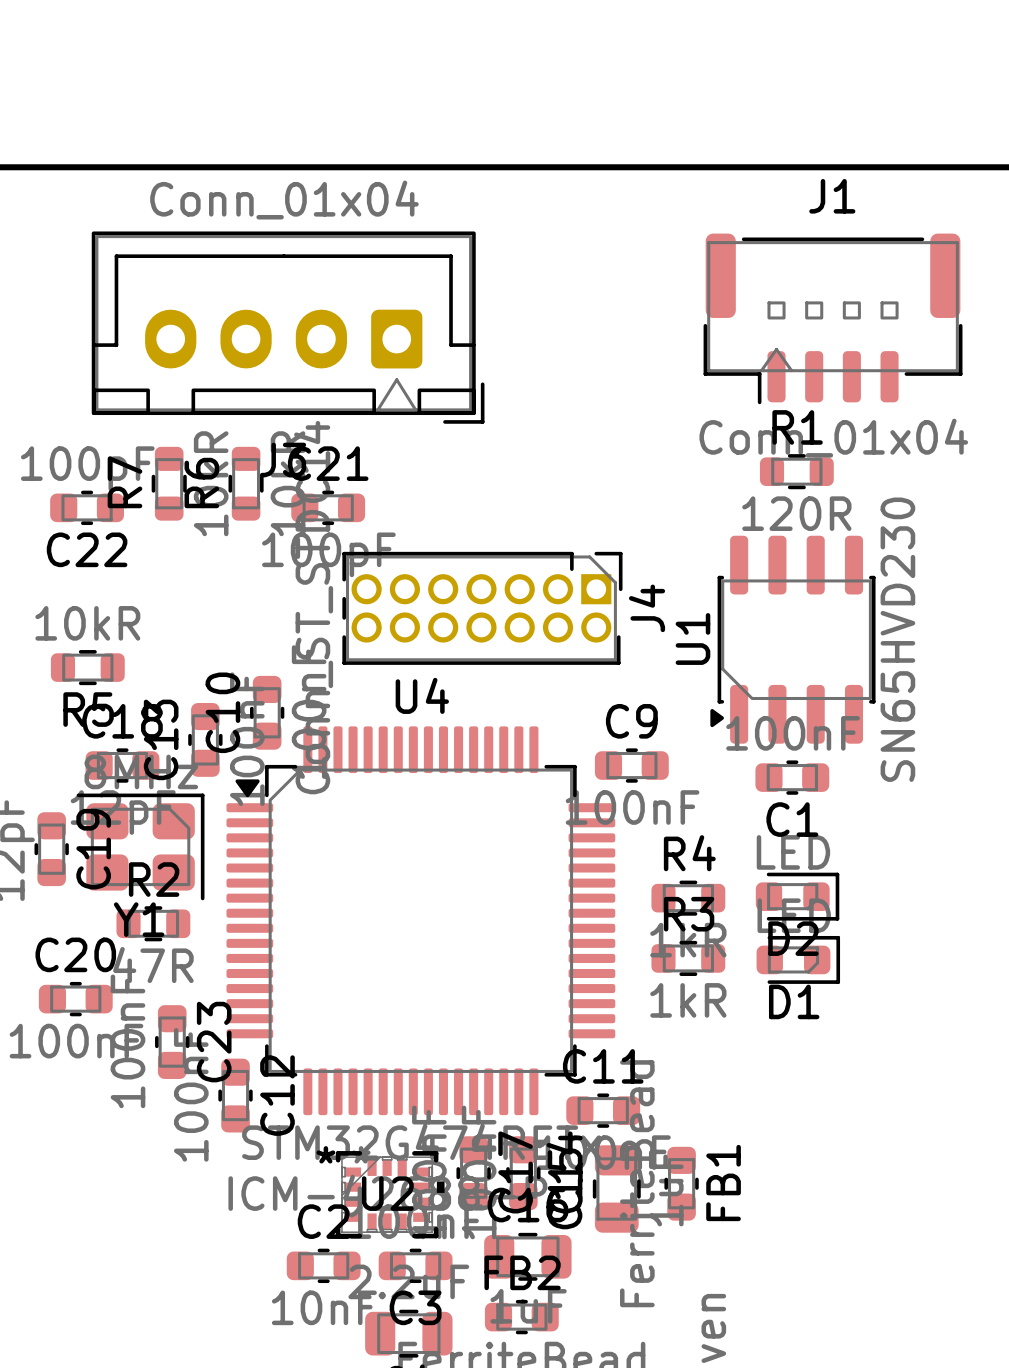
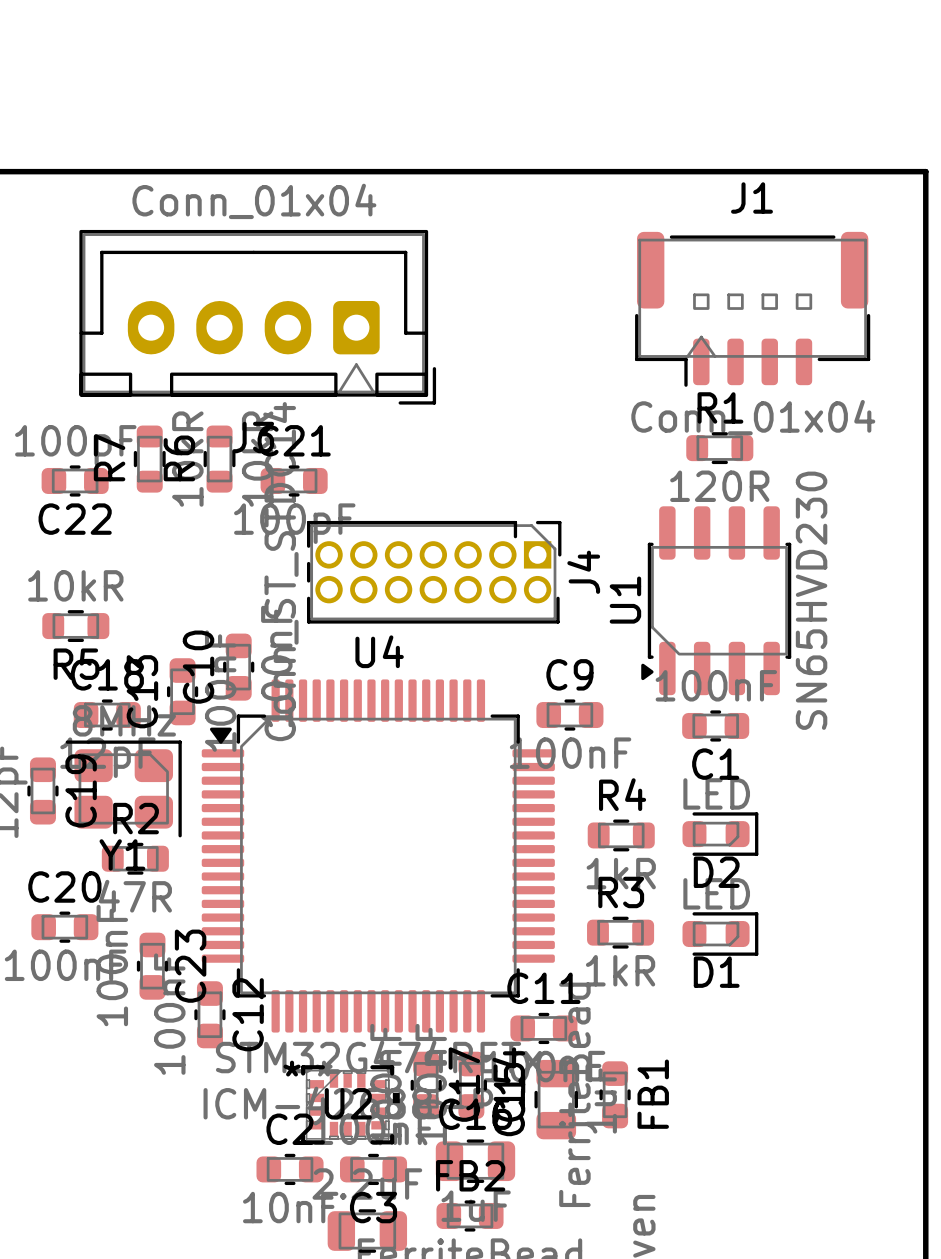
R3 position: (688, 958) -> (620, 932)
D1 position: (798, 959) -> (720, 934)

